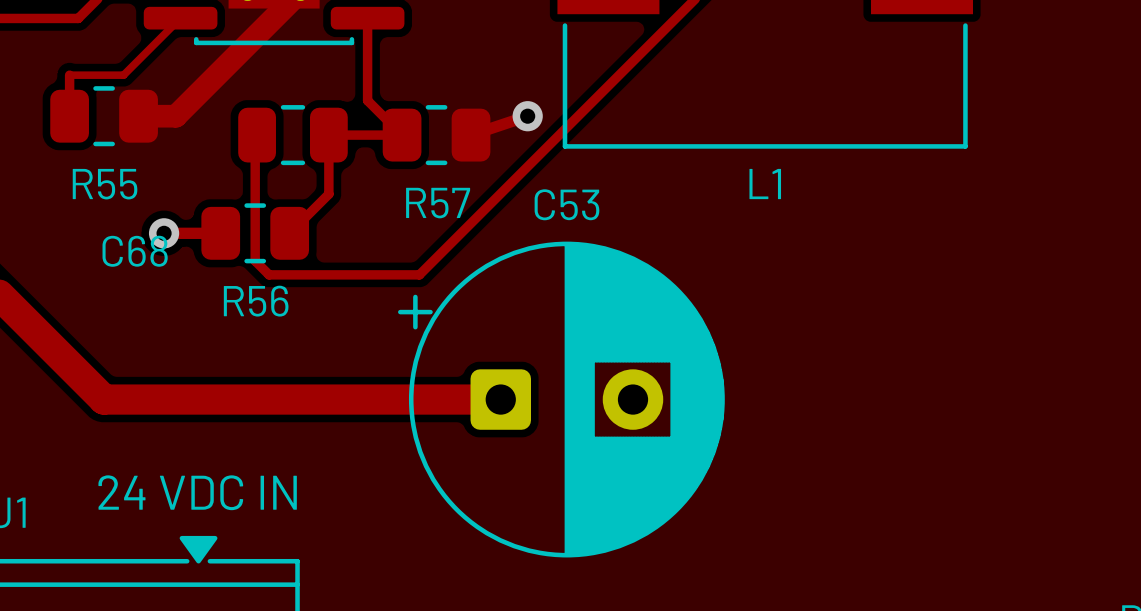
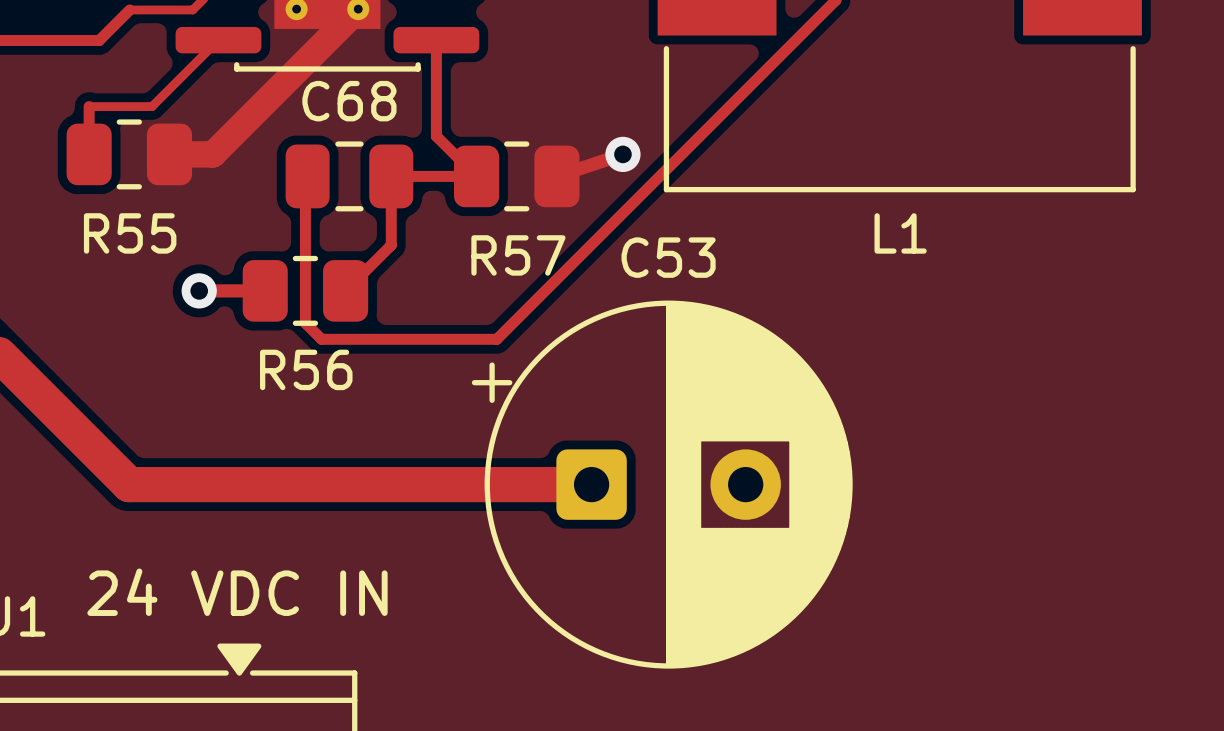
C68 name position: C68 (135, 251) -> C68 (349, 101)

